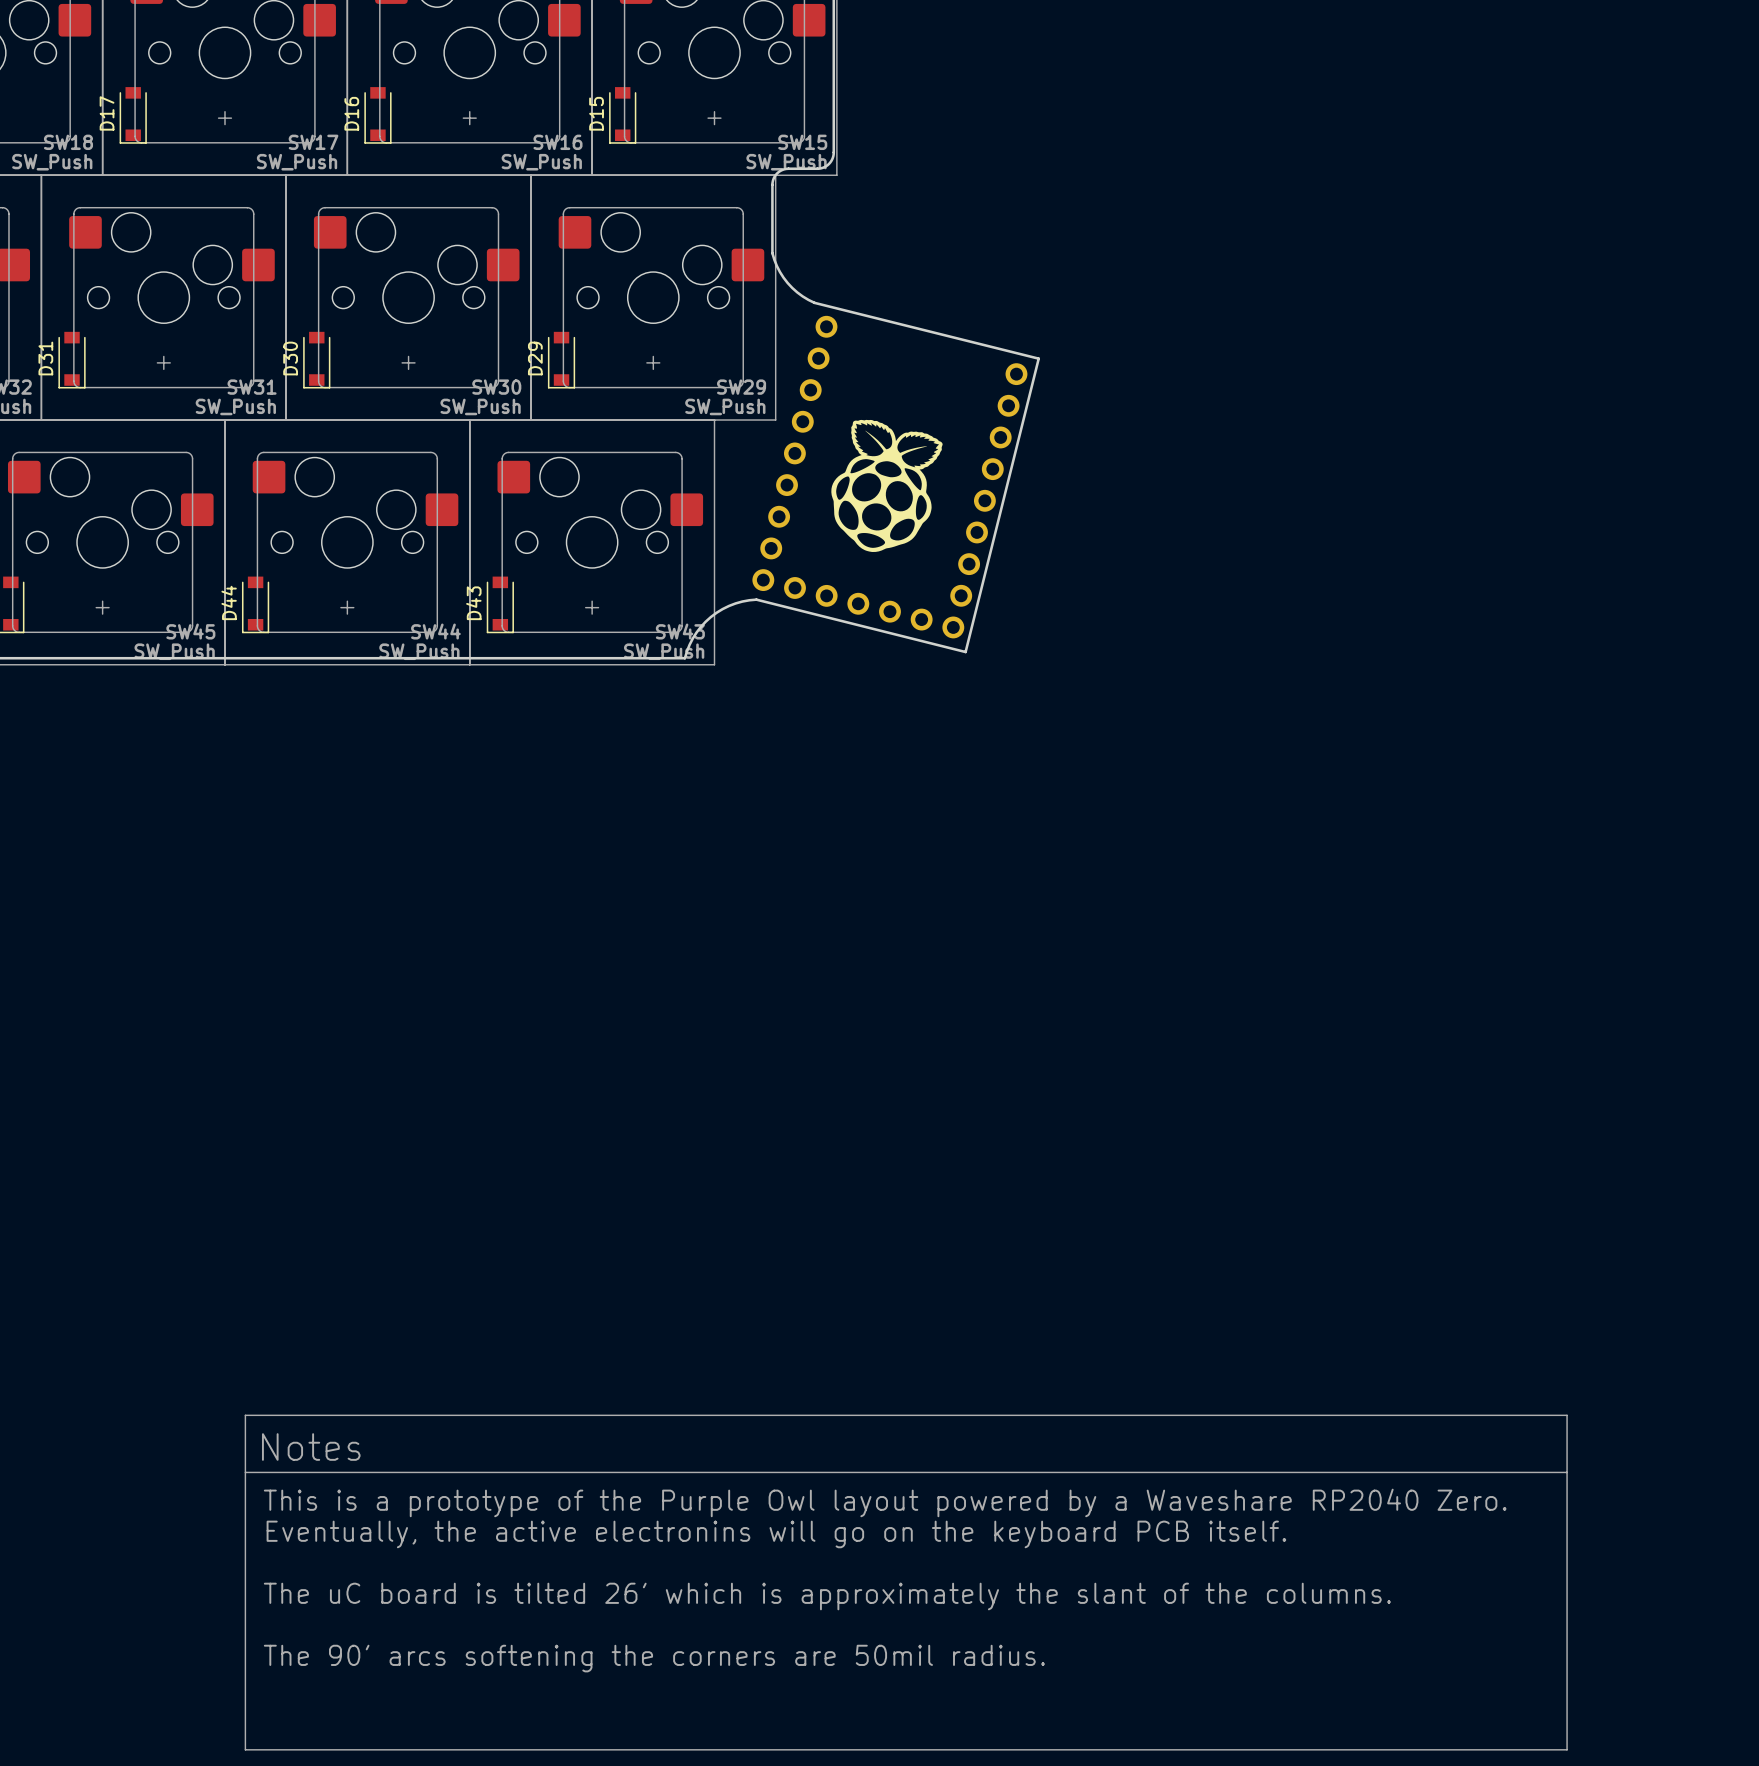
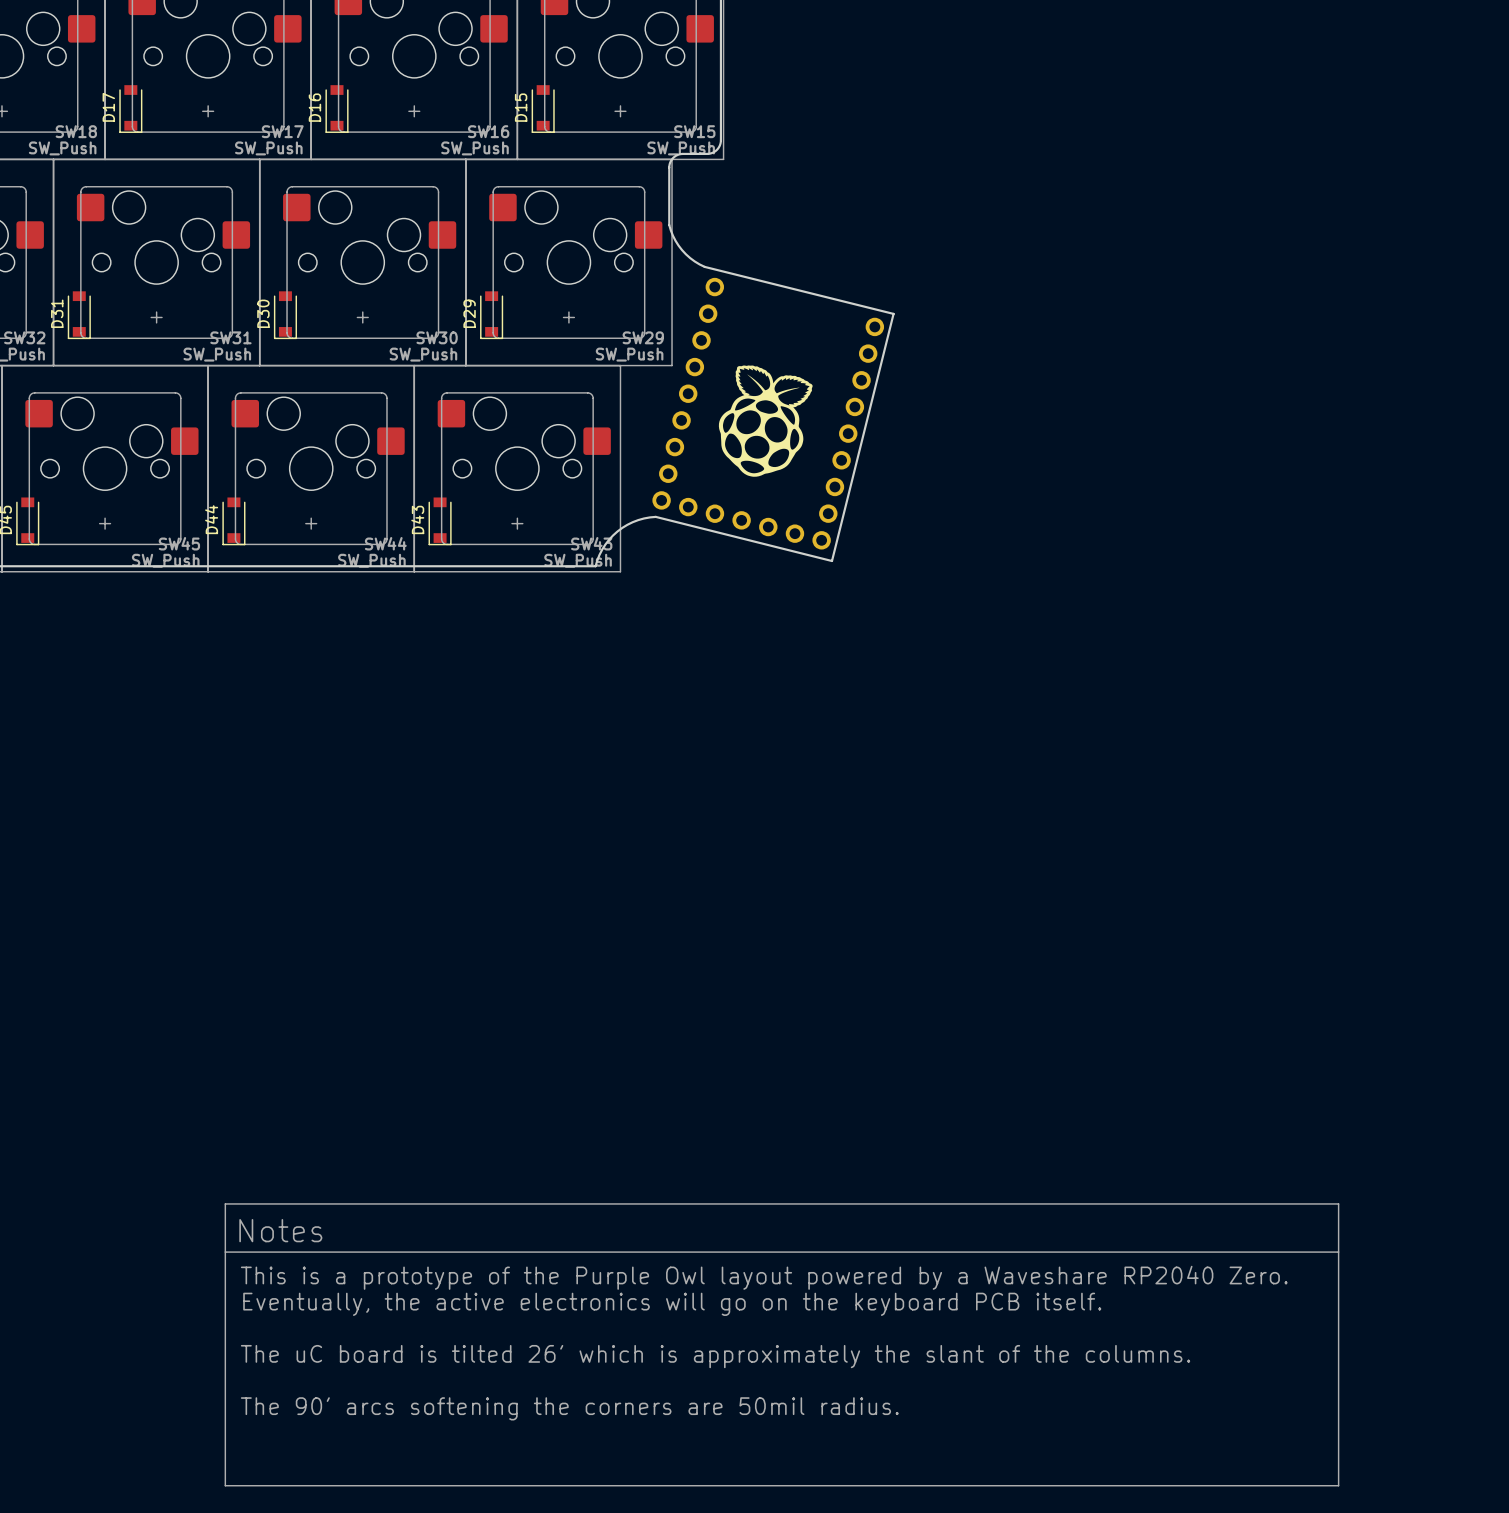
text: Eventually, the active electronins will go on the keyboard PCB itself. (776, 1534) -> Eventually, the active electronics will go on the keyboard PCB itself. (672, 1304)

